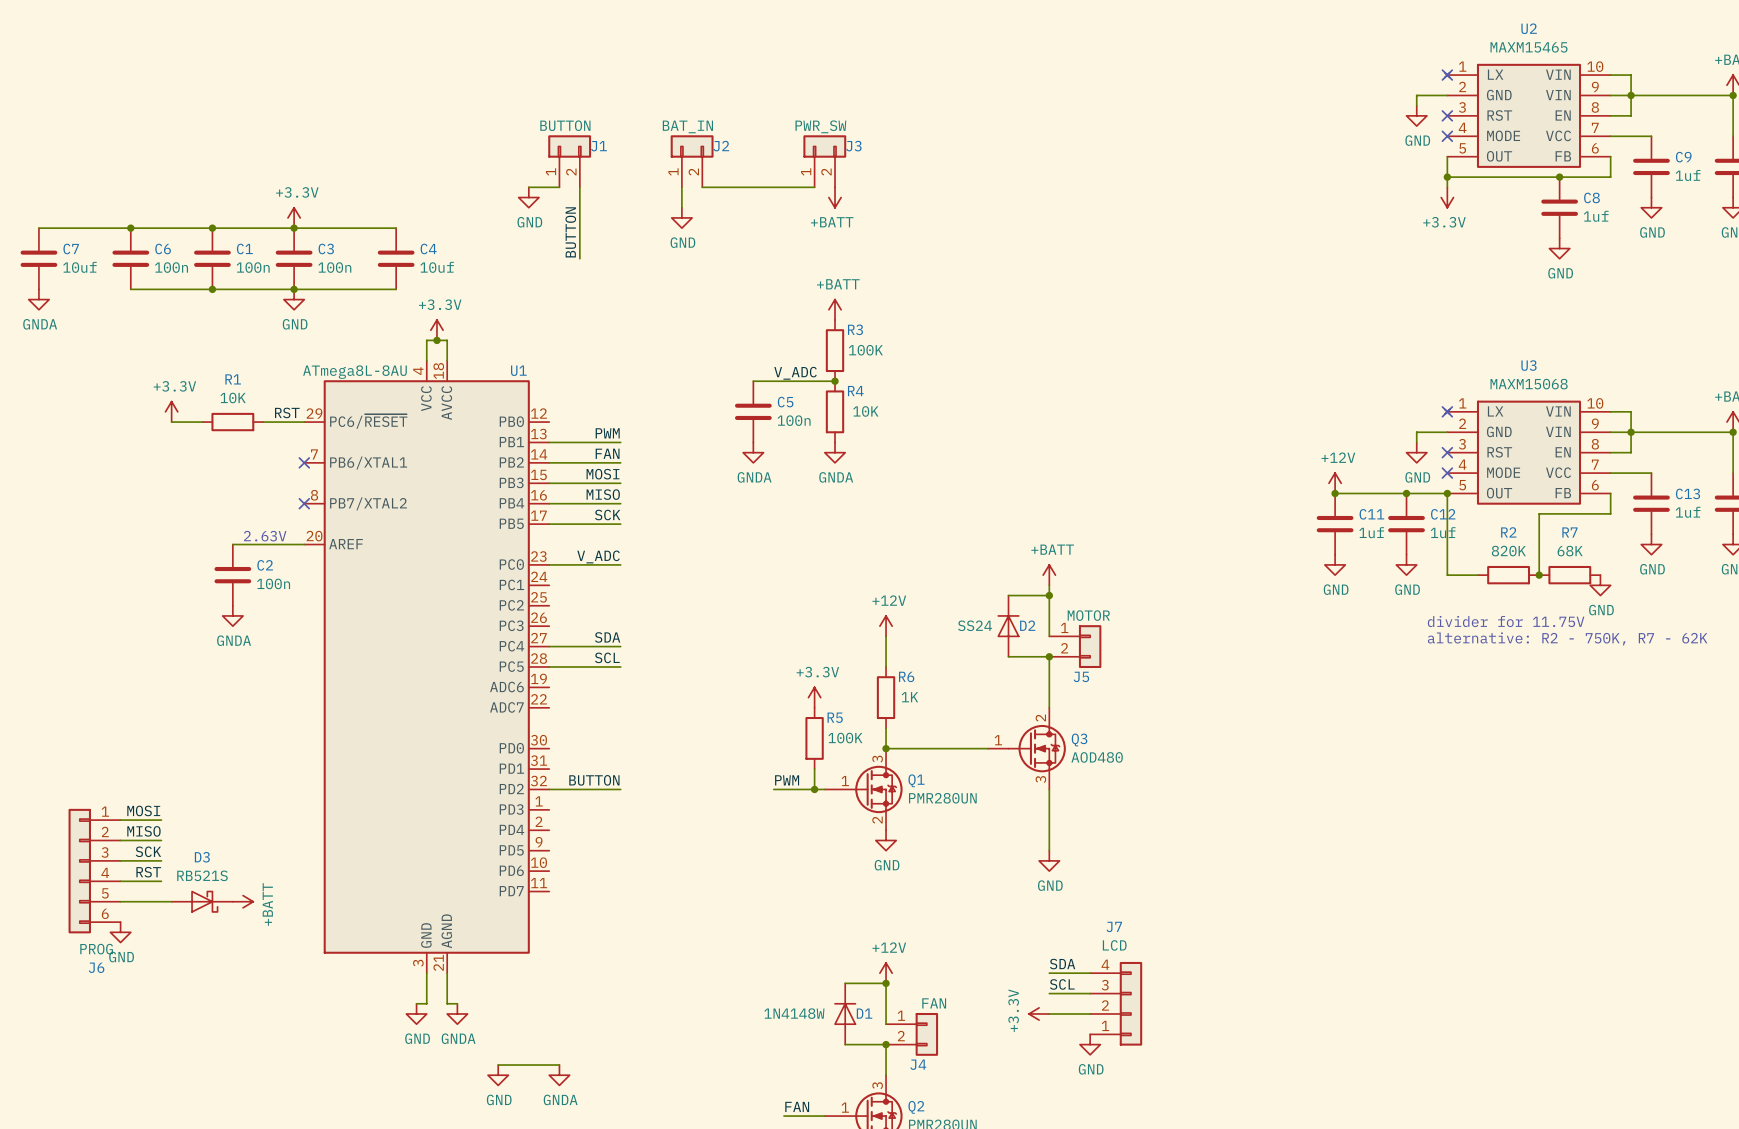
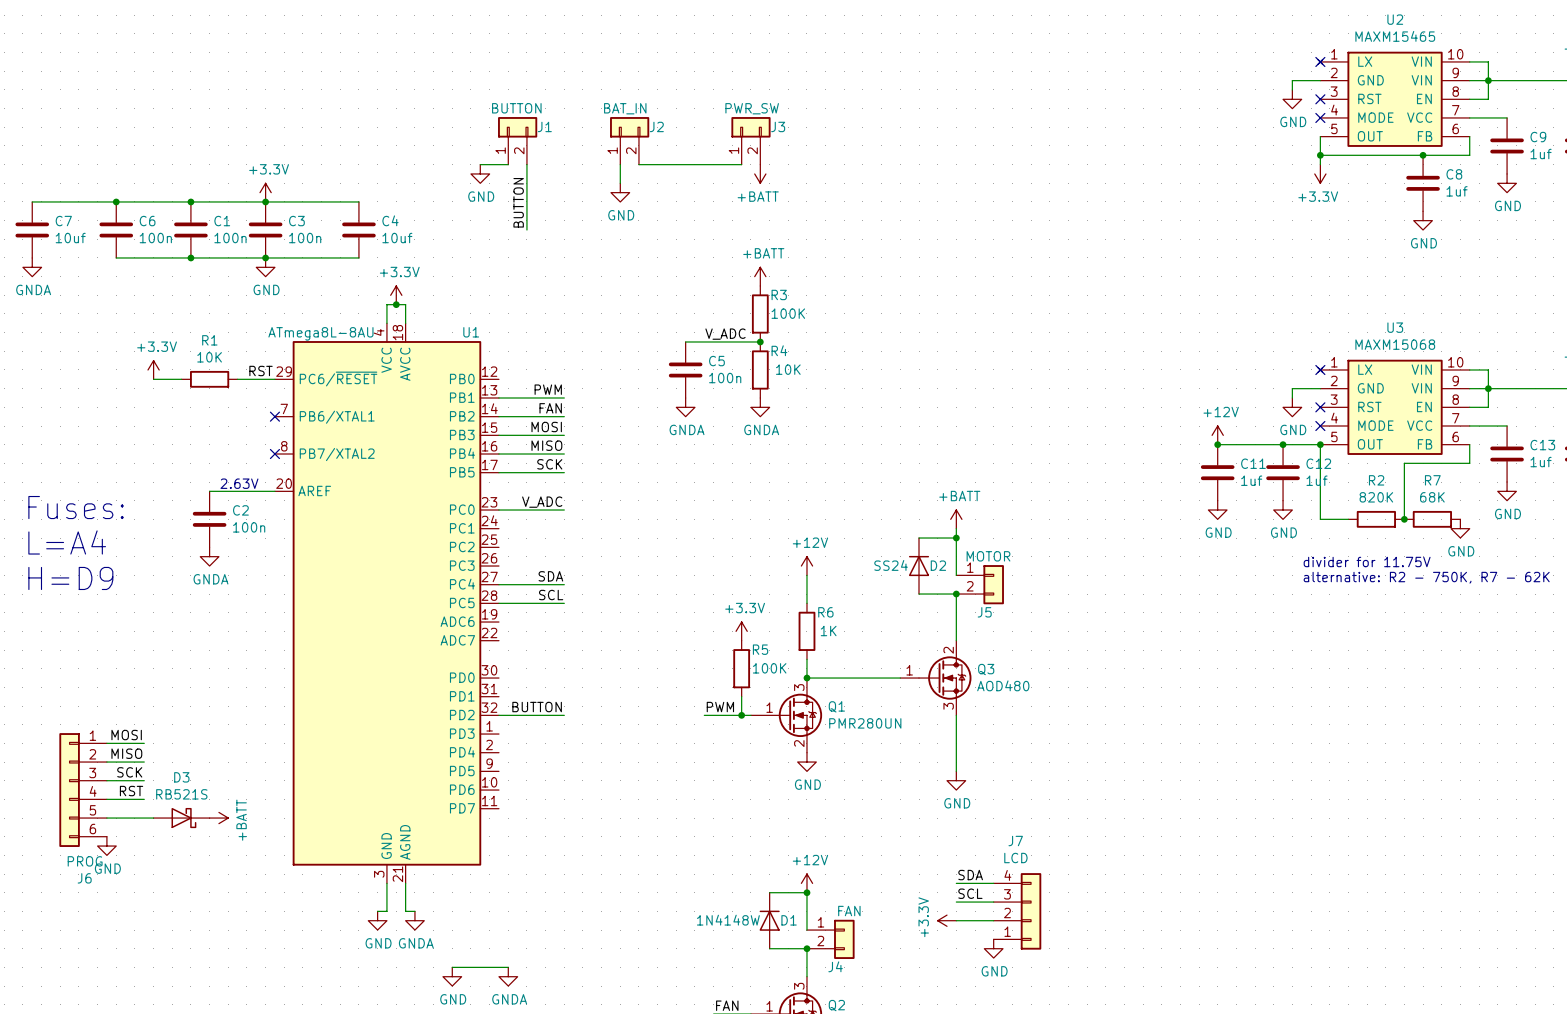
text: none -> Fuses: (76, 507)
text: none -> L=A4 (67, 542)
text: none -> H=D9 (70, 578)

